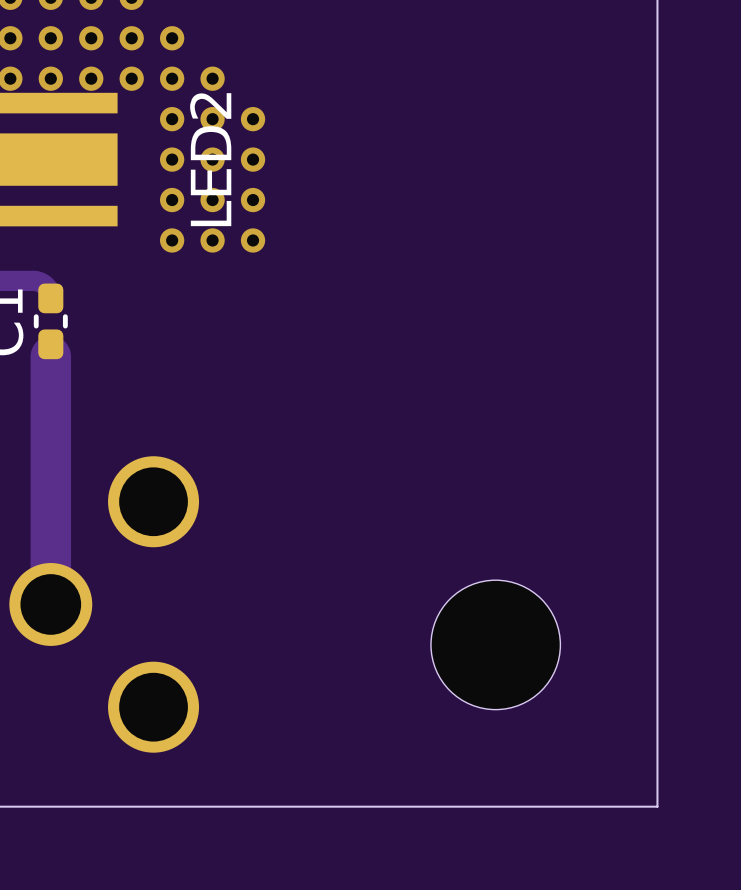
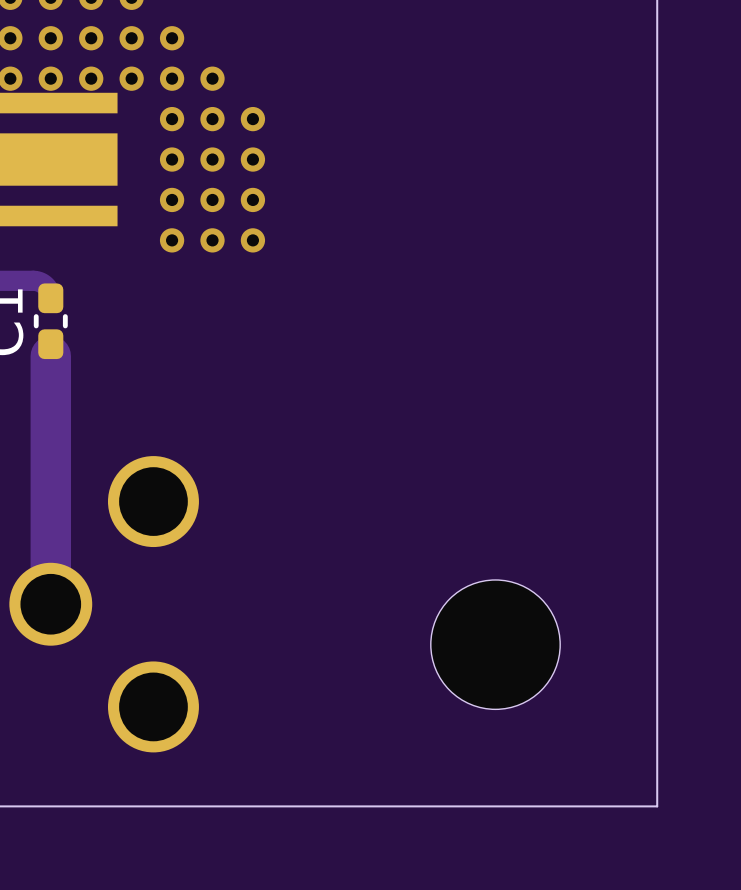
LED2 name: LED2 (210, 159) -> none

